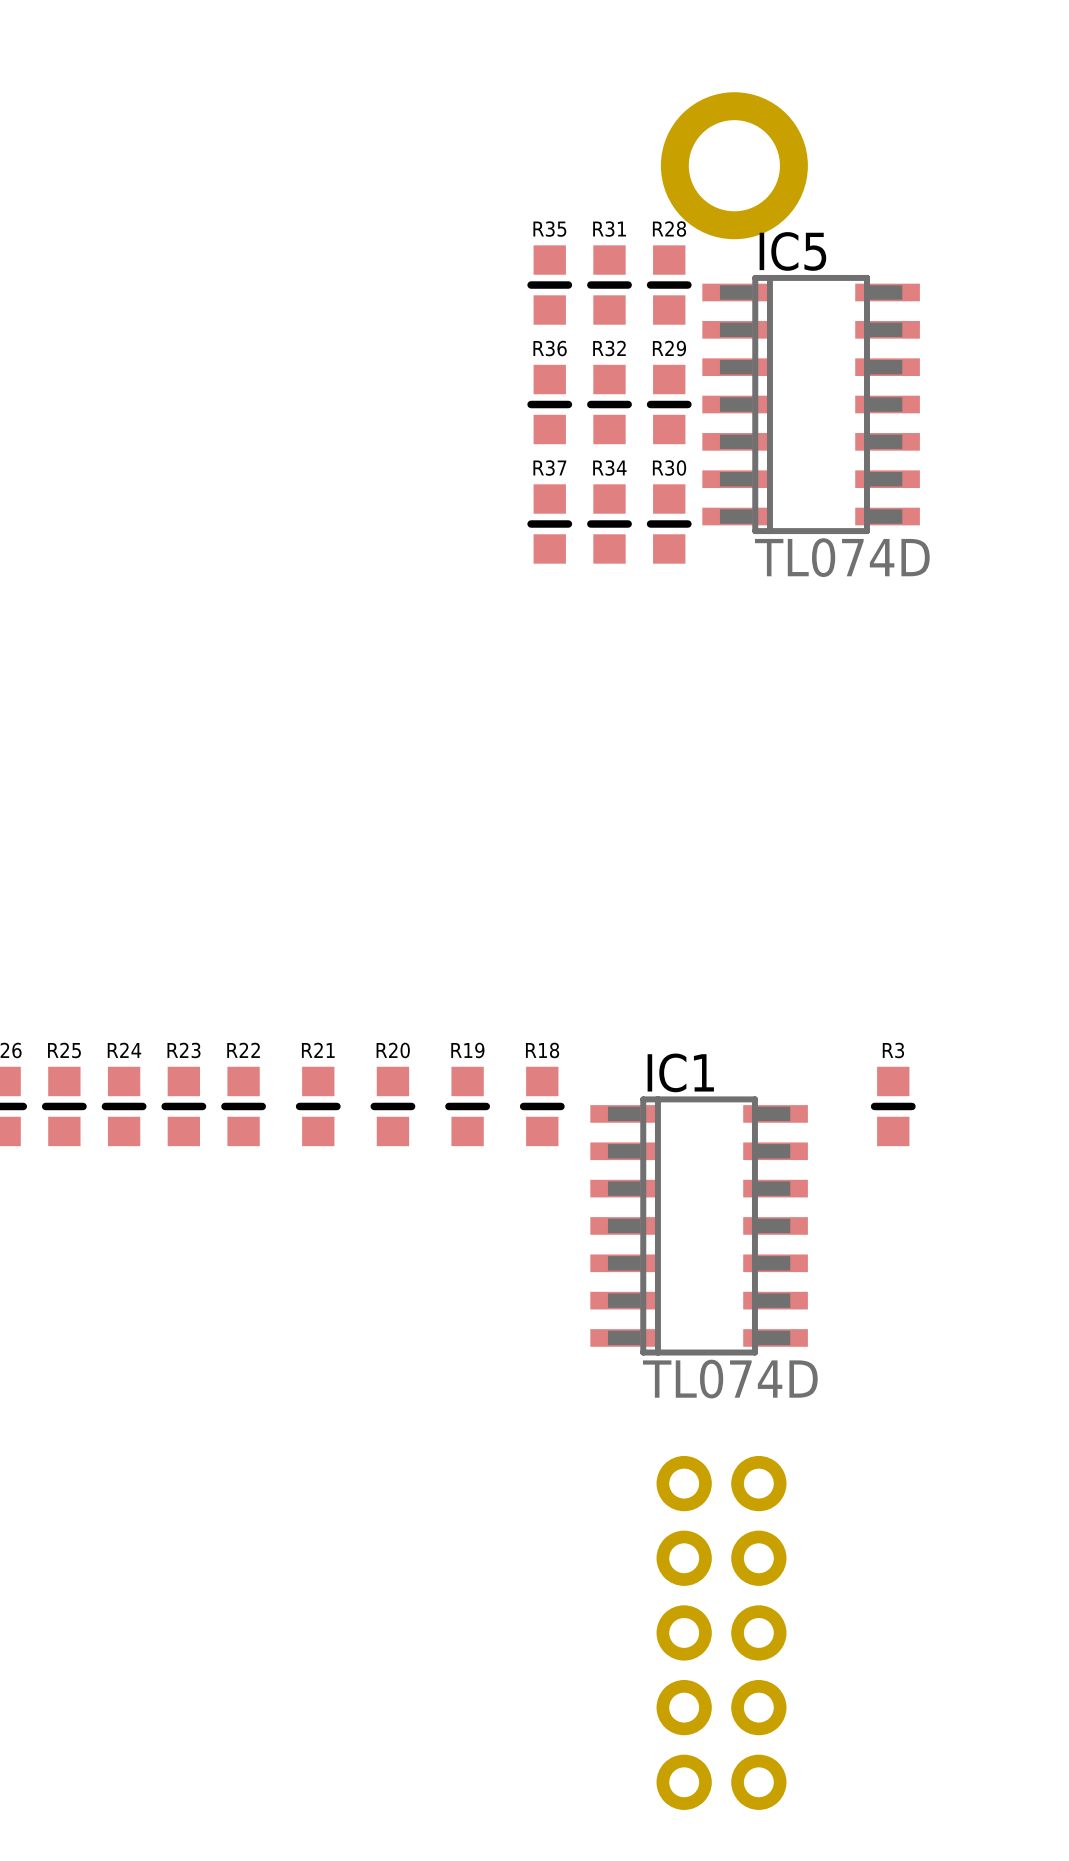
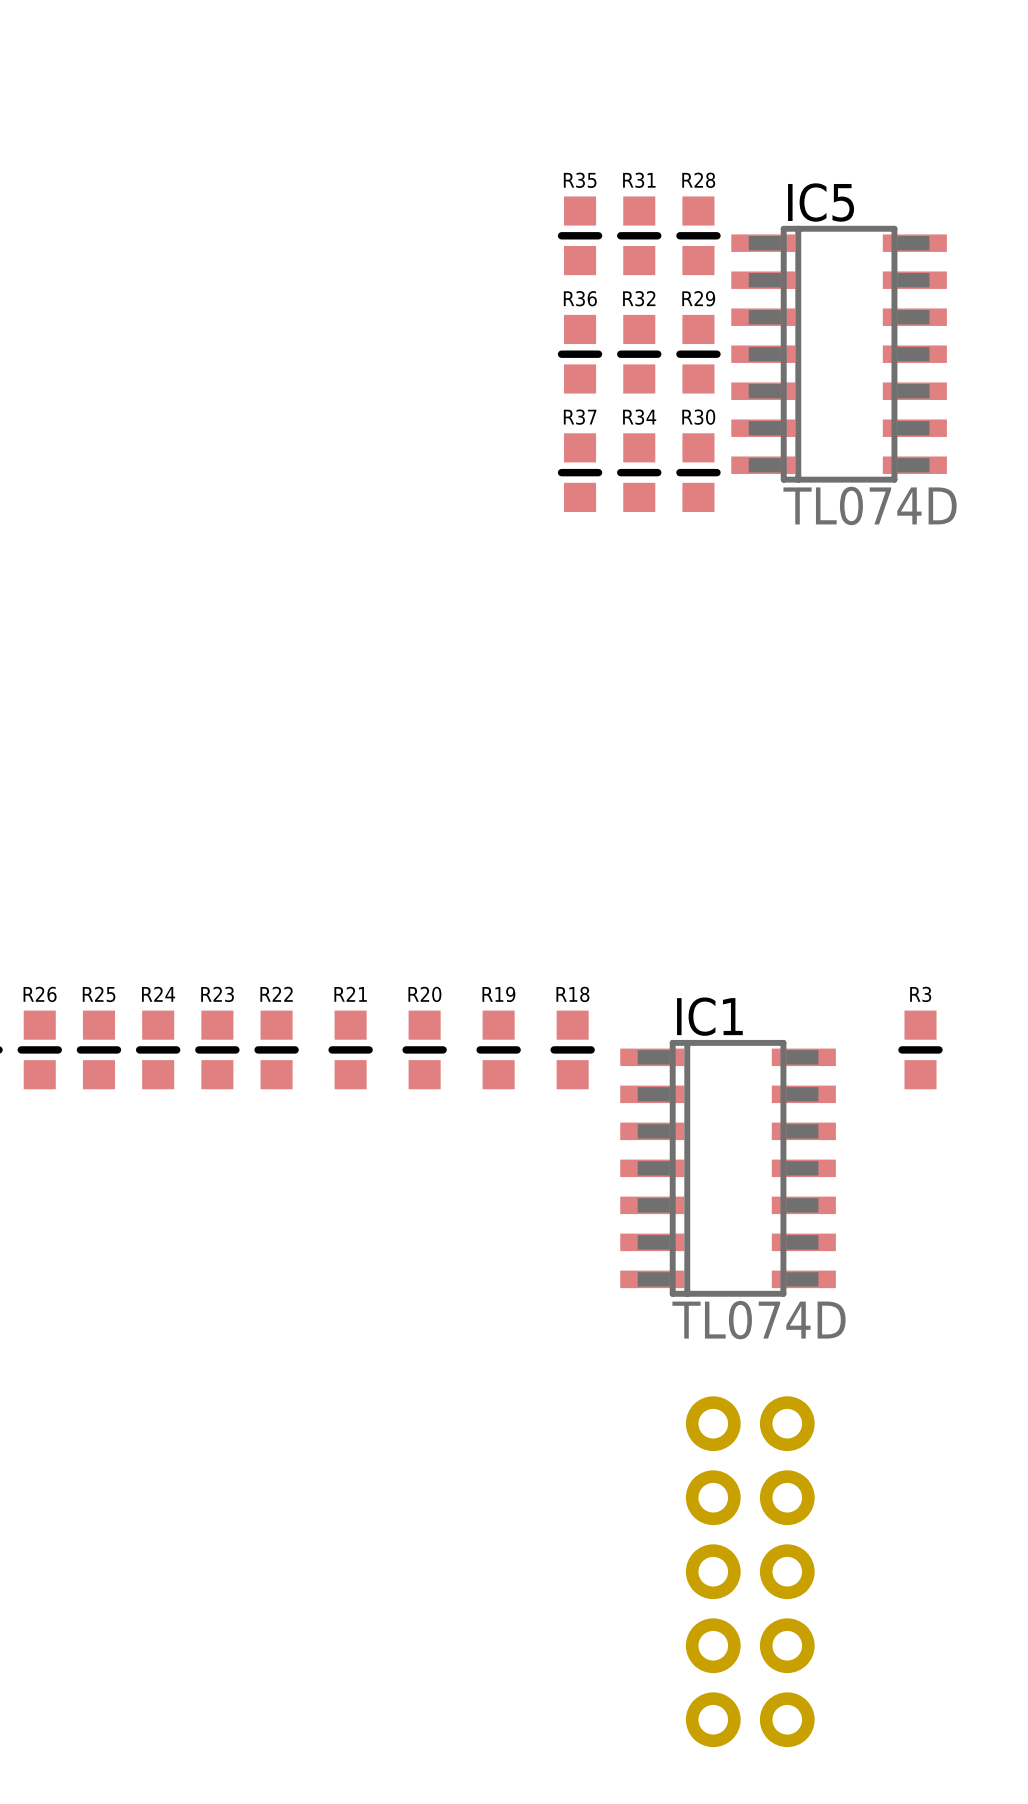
part: (734, 165) -> none

